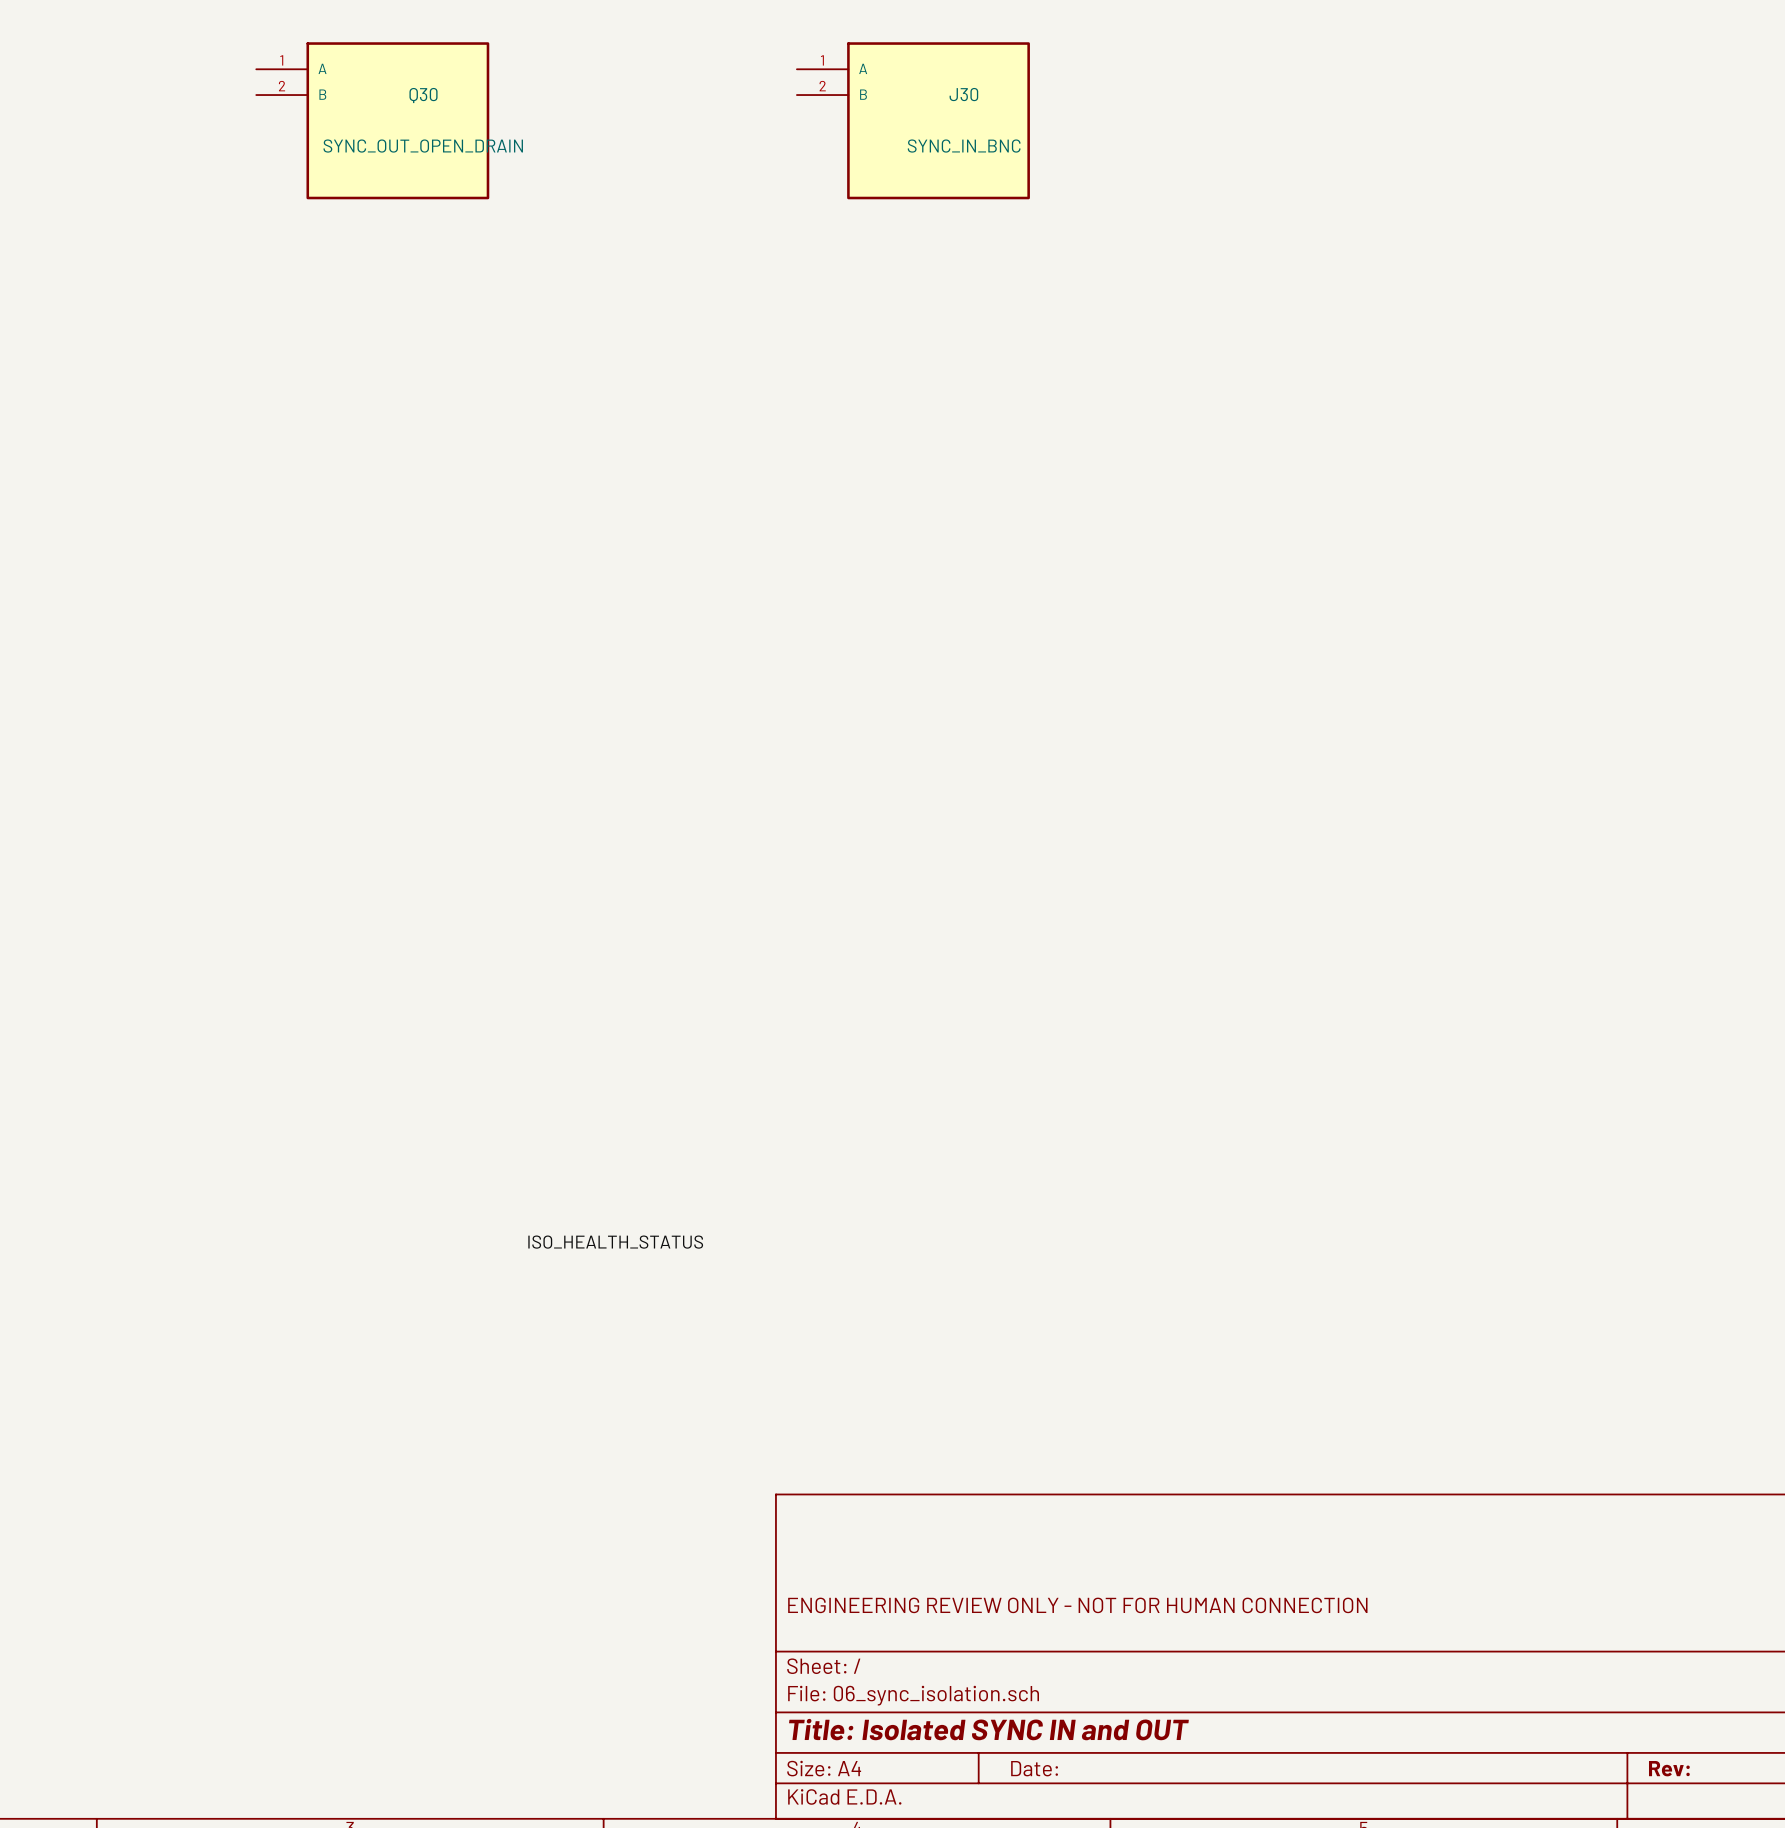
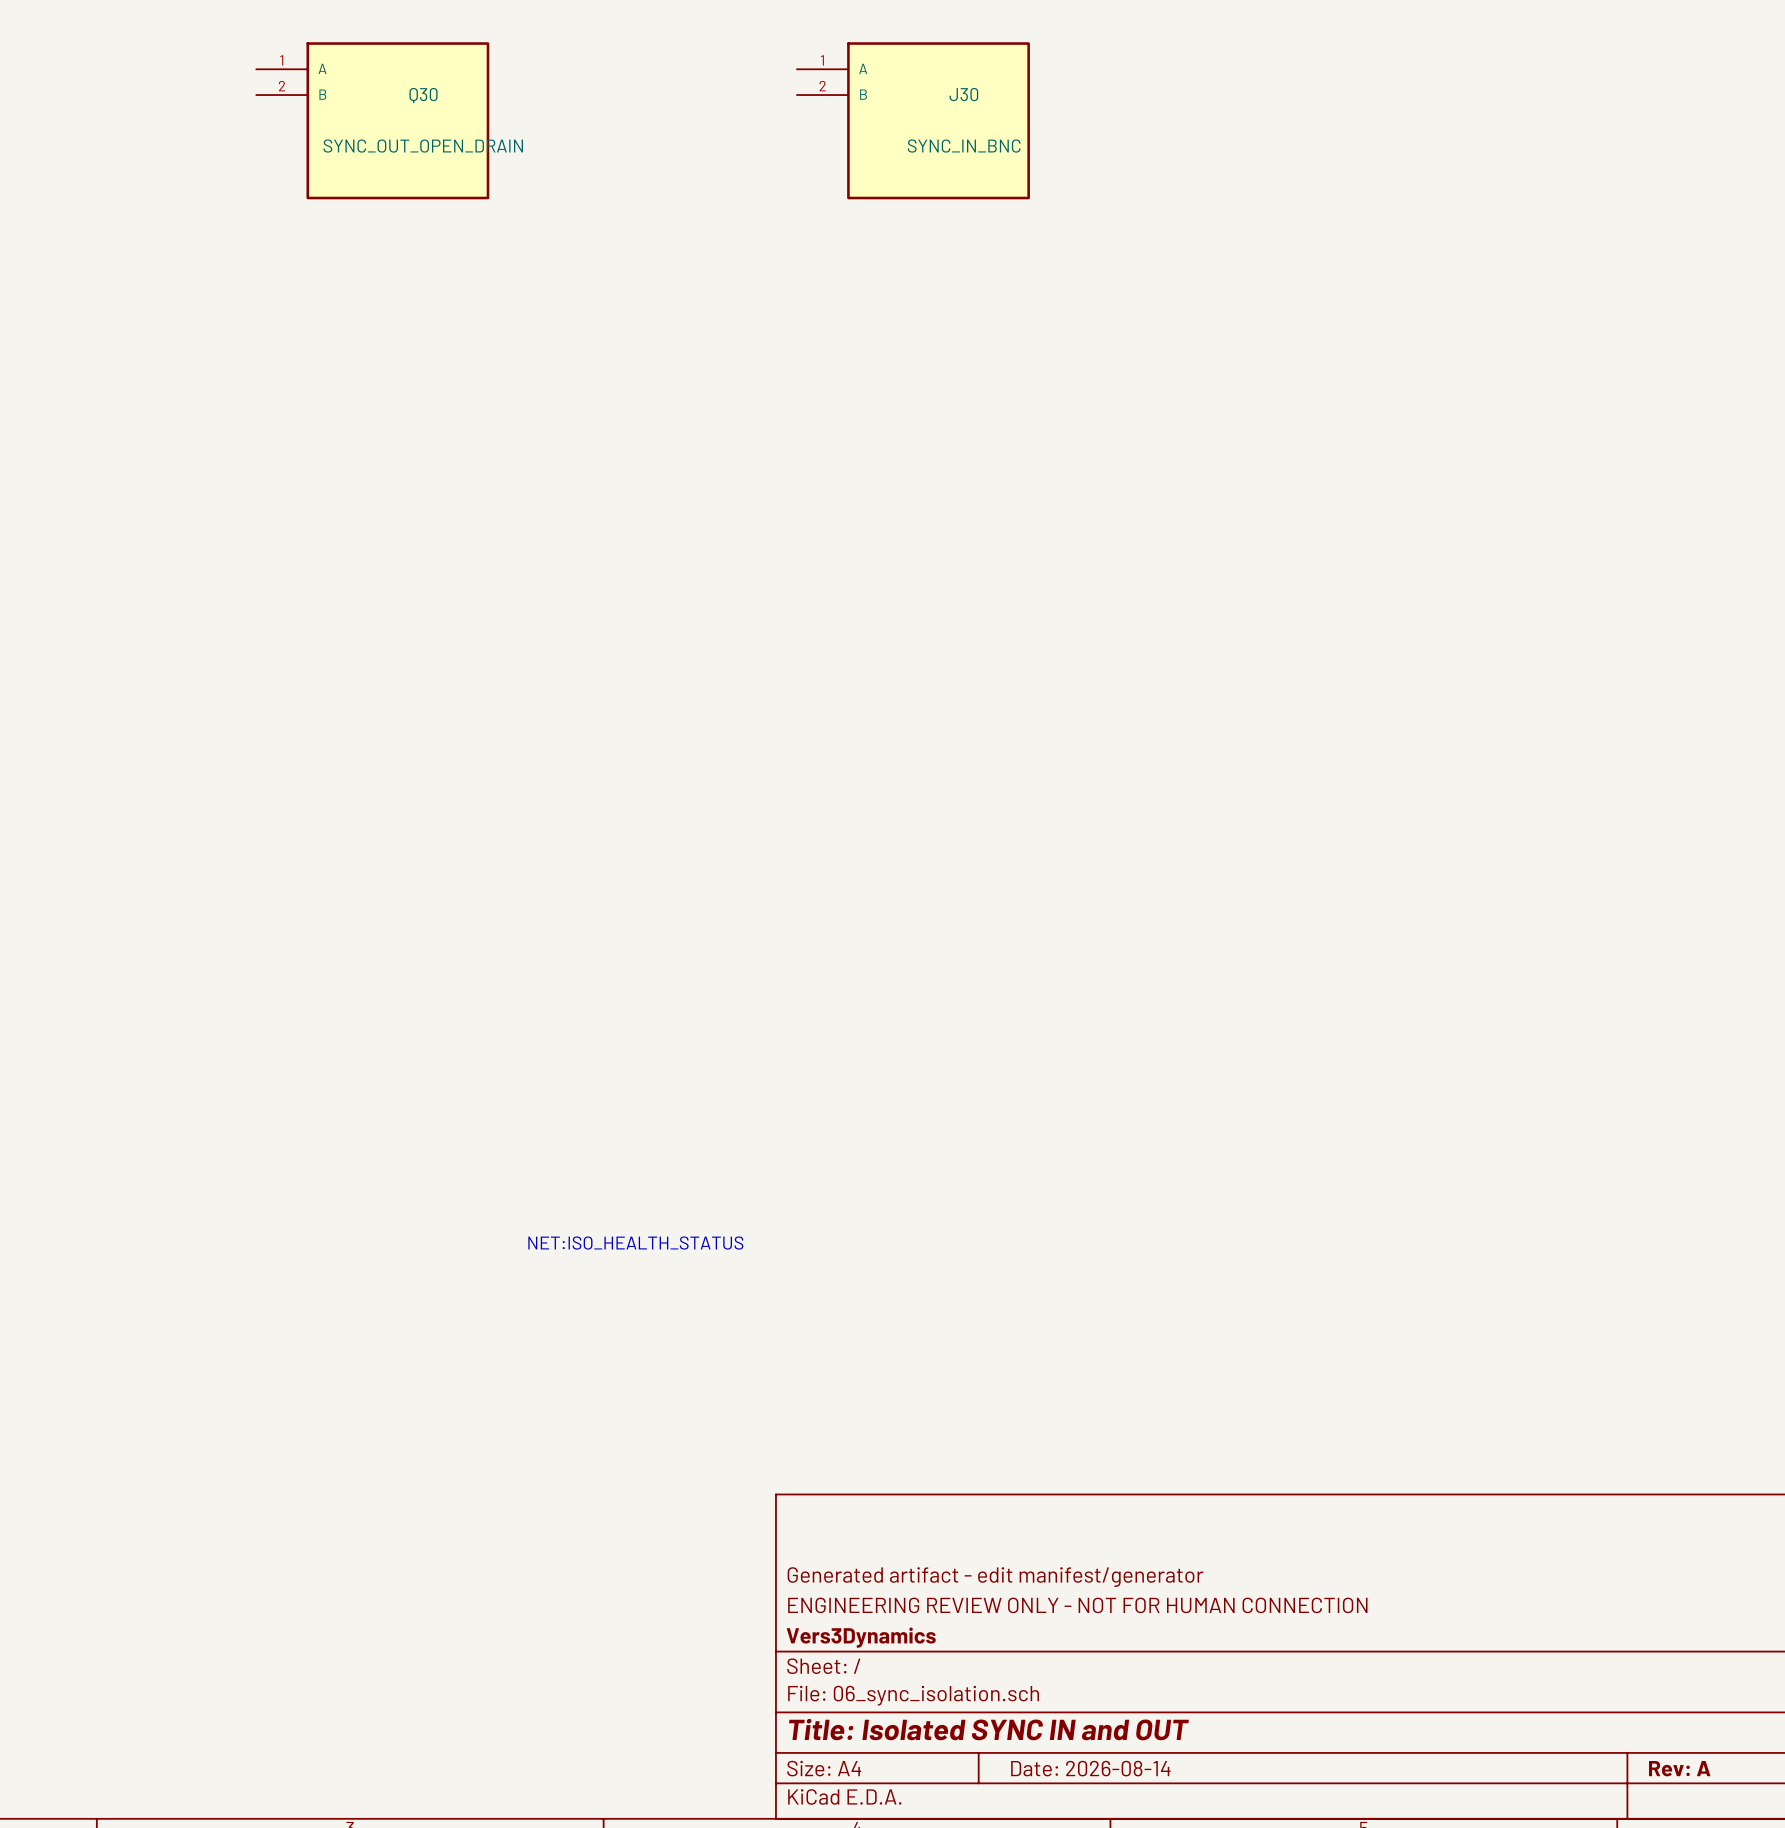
label: ISO_HEALTH_STATUS (615, 1242) -> none
text: none -> NET:ISO_HEALTH_STATUS (635, 1243)
title block: none -> Generated artifact - edit manifest/generator (995, 1577)
title block: none -> Vers3Dynamics (861, 1637)
title block: Date: (1034, 1768) -> Date: 2026-08-14 (1090, 1768)
title block: Rev: (1669, 1768) -> Rev: A (1679, 1768)

